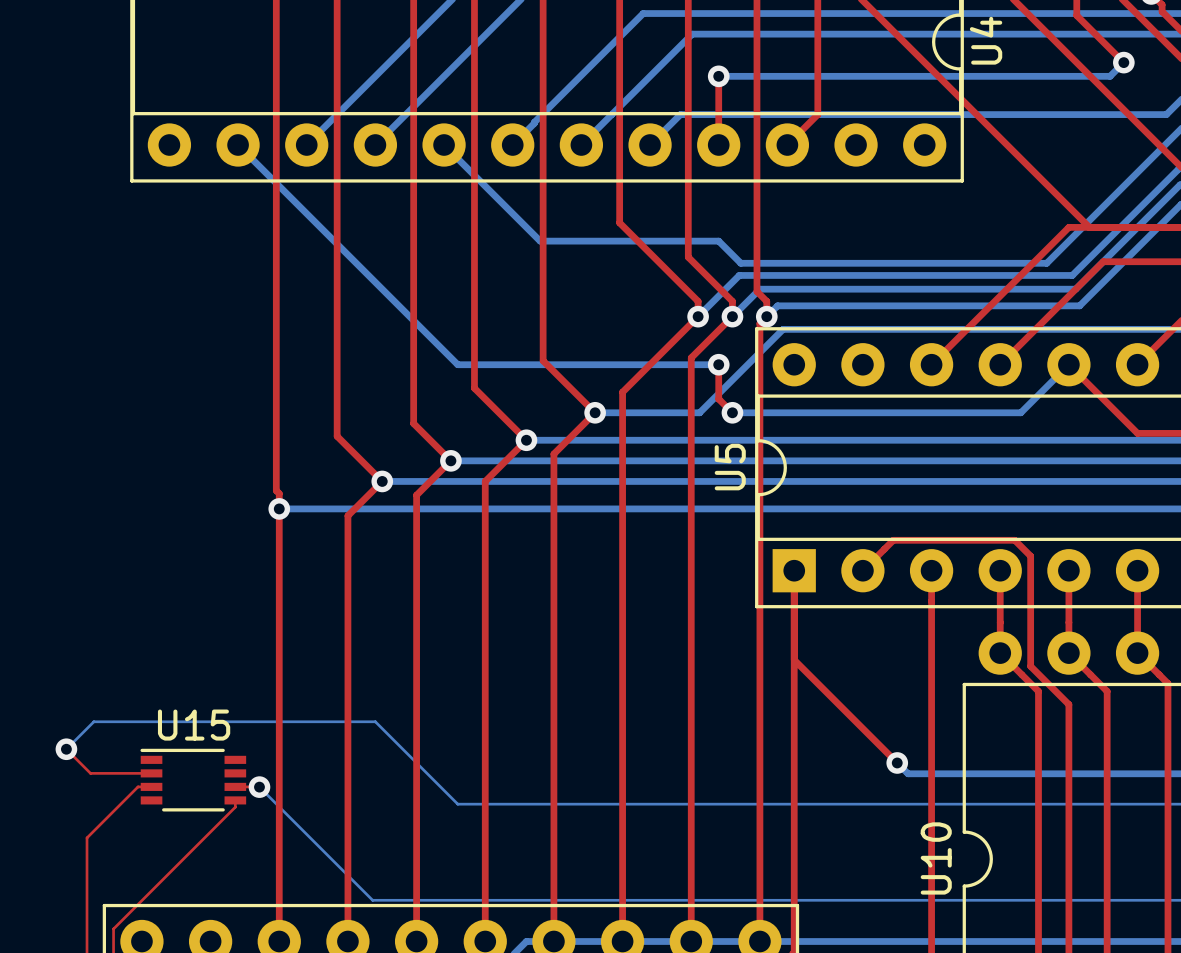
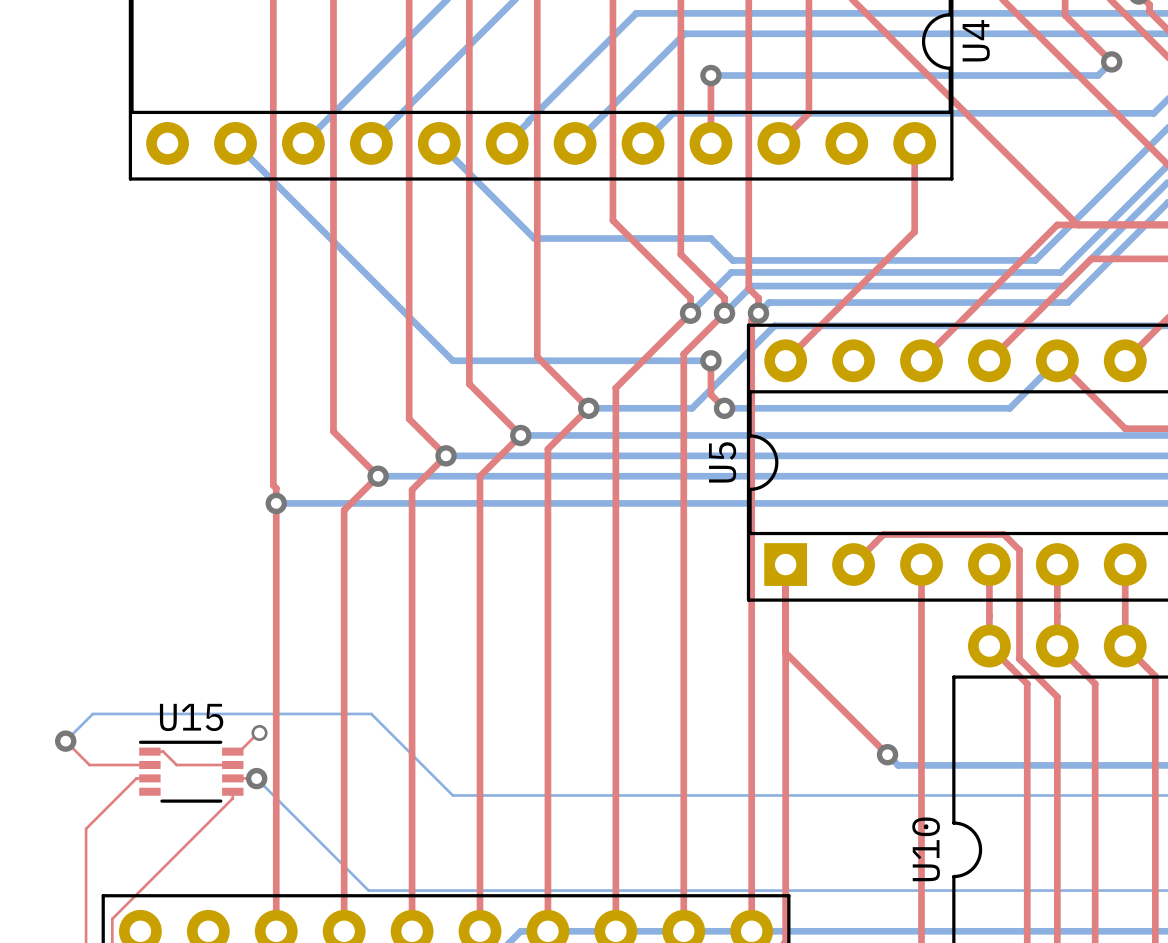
top track: none -> (914, 143) (914, 231) (785, 360)
top track: none -> (259, 732) (239, 751) (232, 751)
via: none -> (259, 732)
top track: none -> (149, 751) (163, 751) (176, 765) (232, 765)

